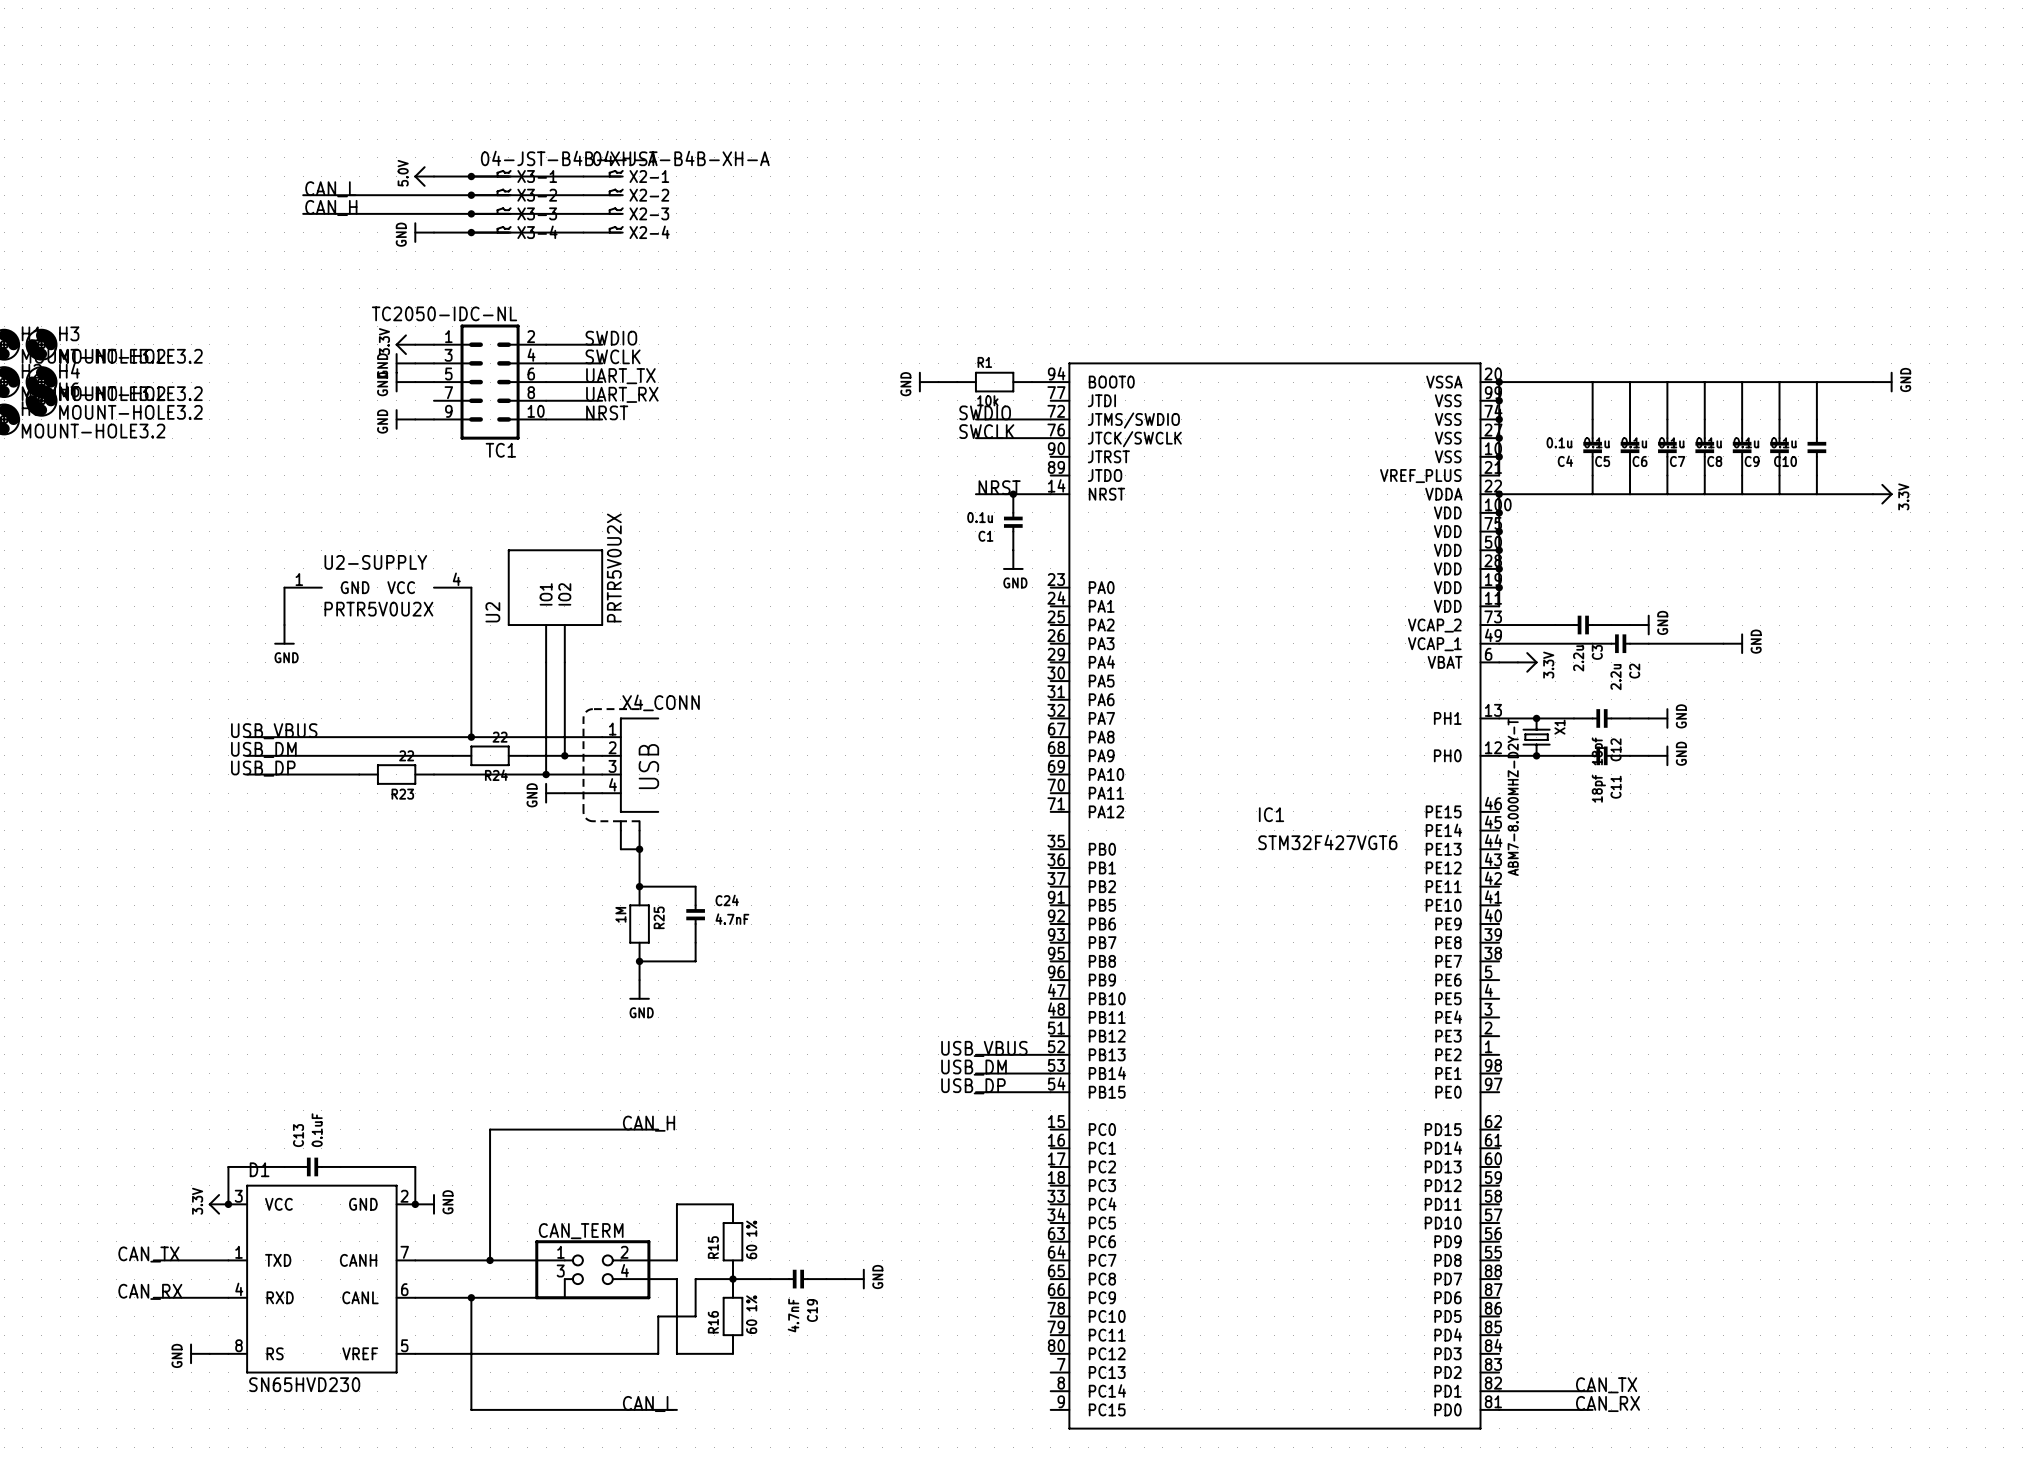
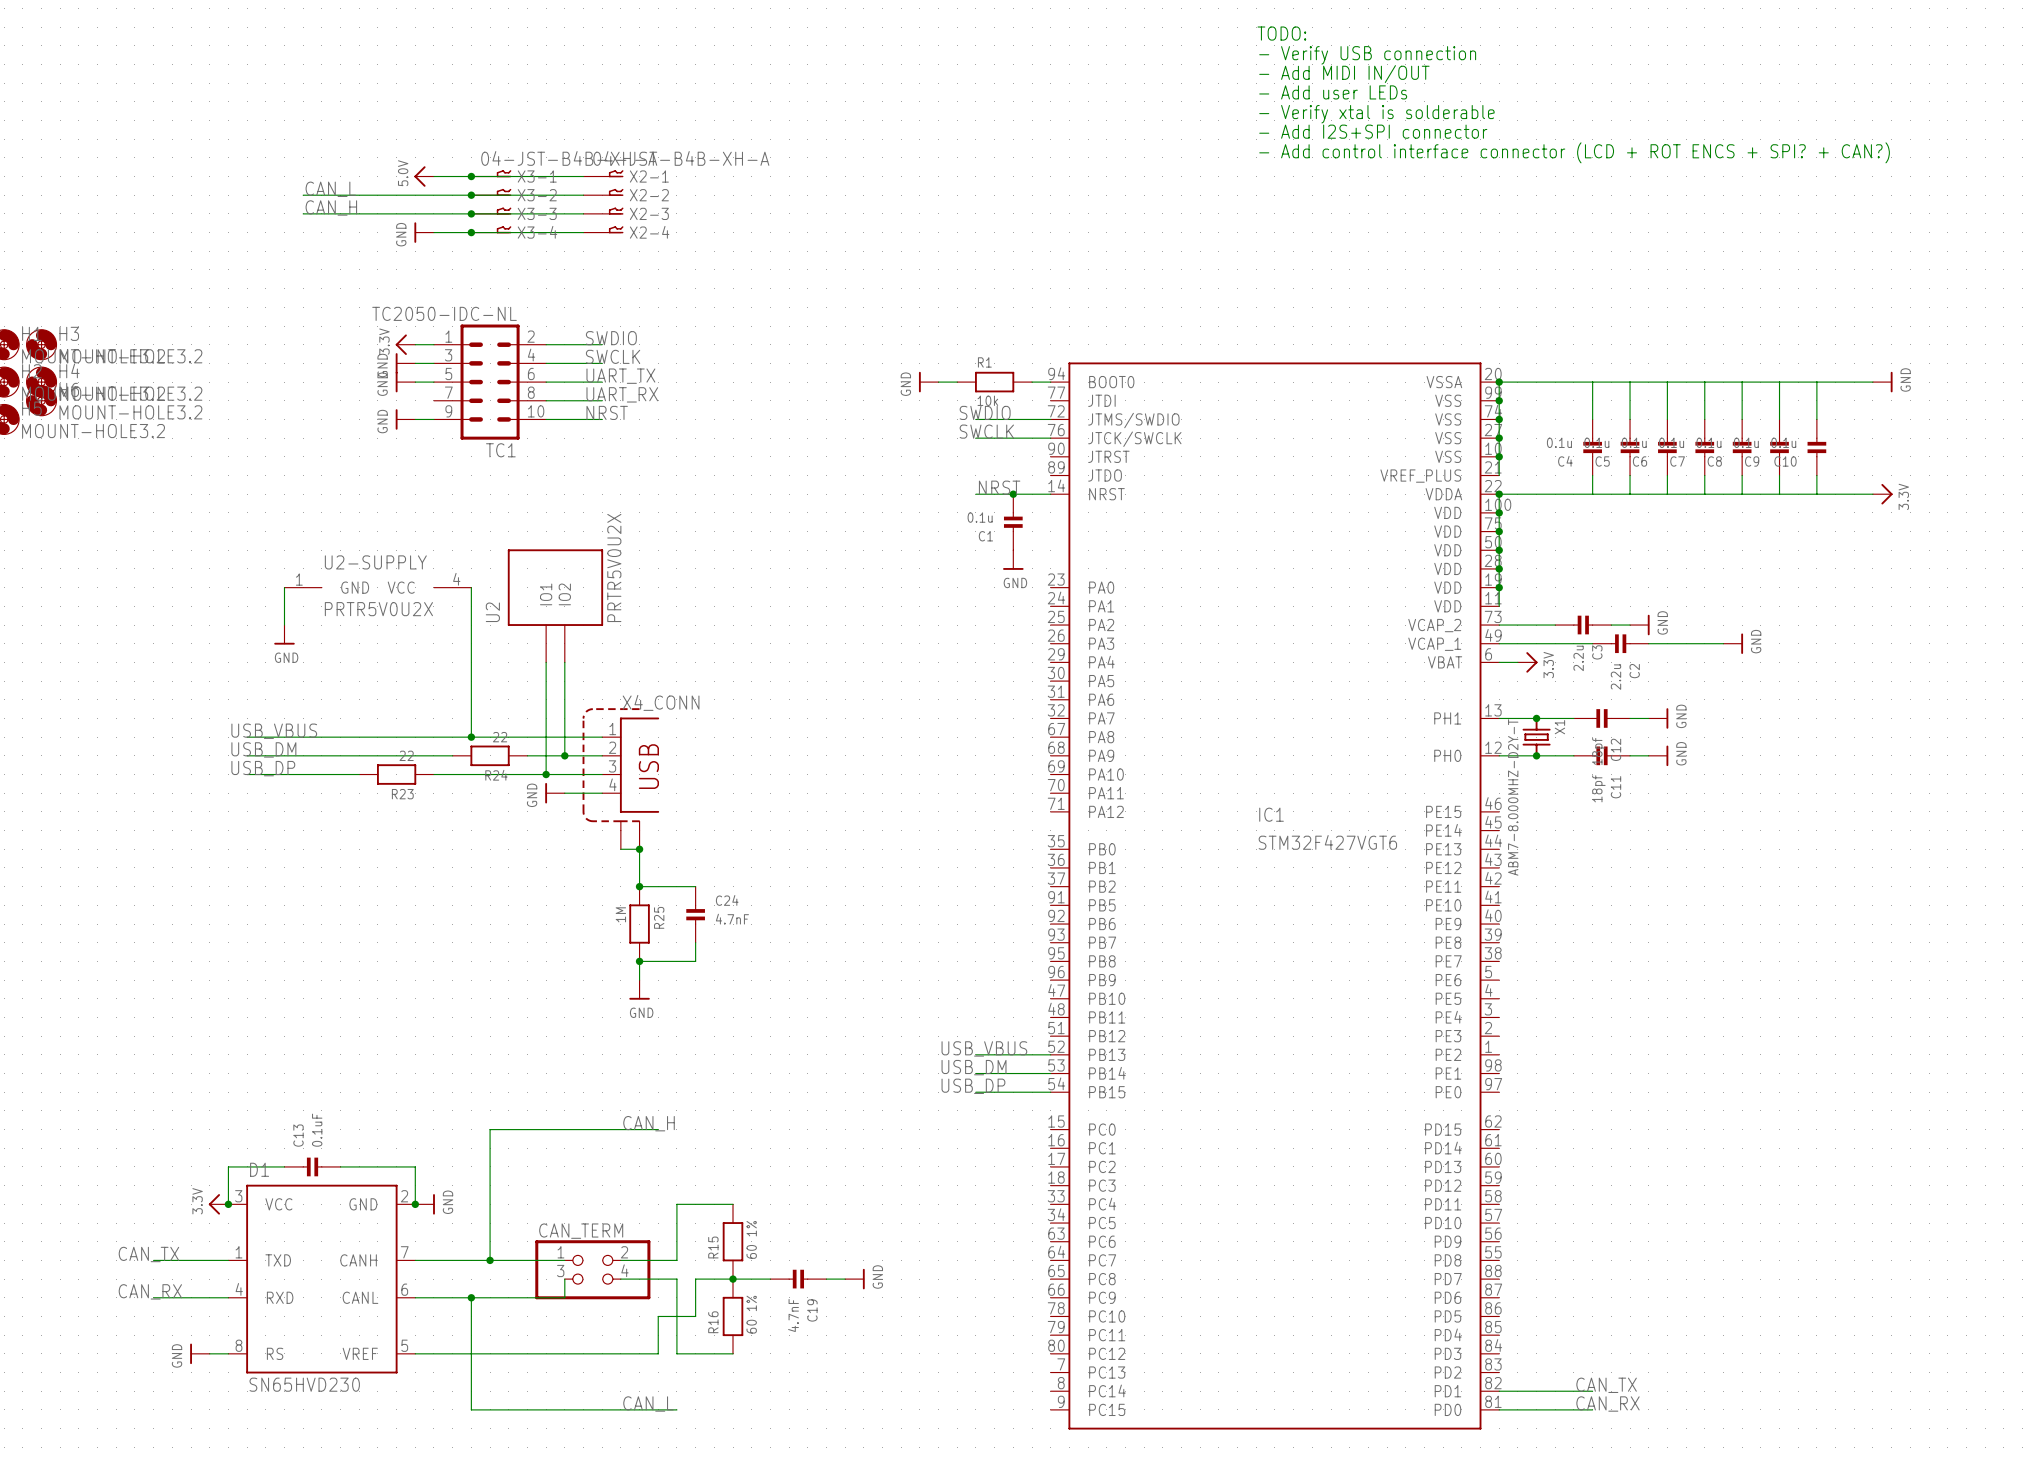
text: none -> TODO: (1281, 33)
text: none -> - Verify USB connection (1367, 55)
text: none -> - Add MIDI IN/OUT (1344, 74)
text: none -> - Add user LEDs (1333, 92)
text: none -> - Verify xtal is solderable (1376, 114)
text: none -> - Add I2S+SPI connector (1373, 131)
text: none -> - Add control interface connector (LCD + ROT ENCS + SPI? + CAN?) (1574, 152)

